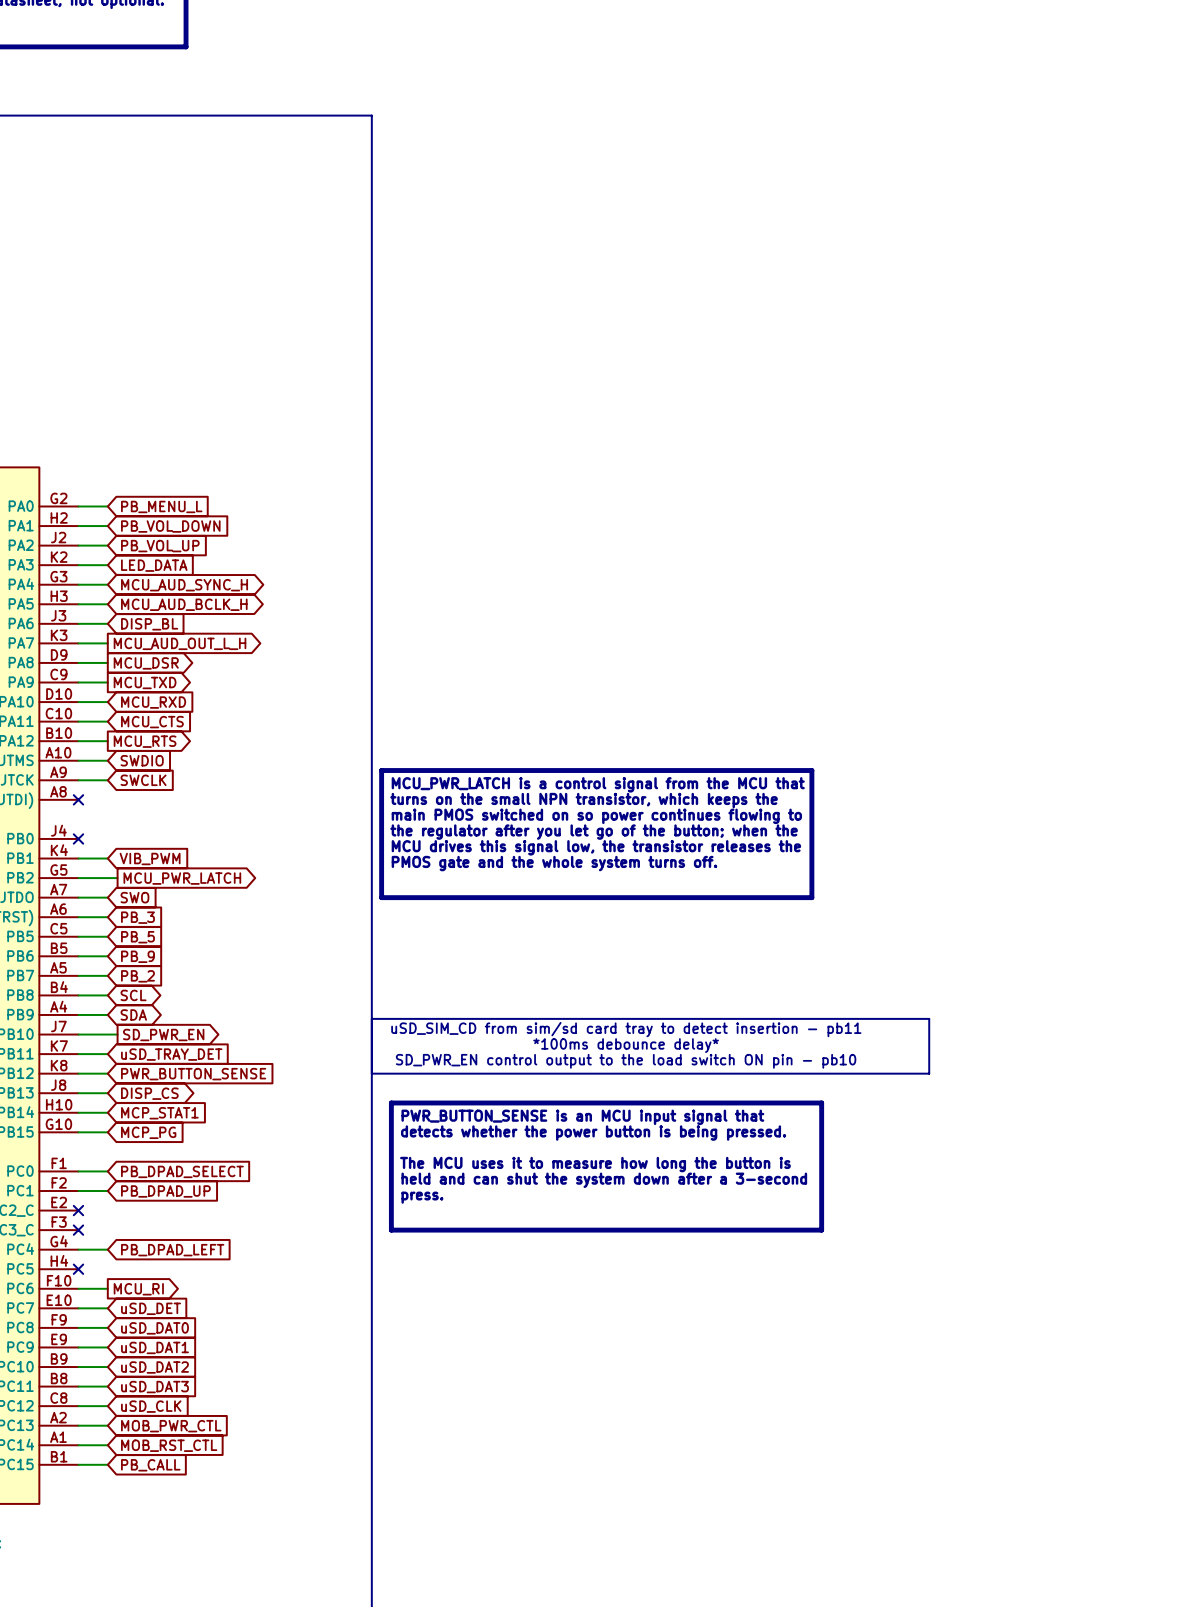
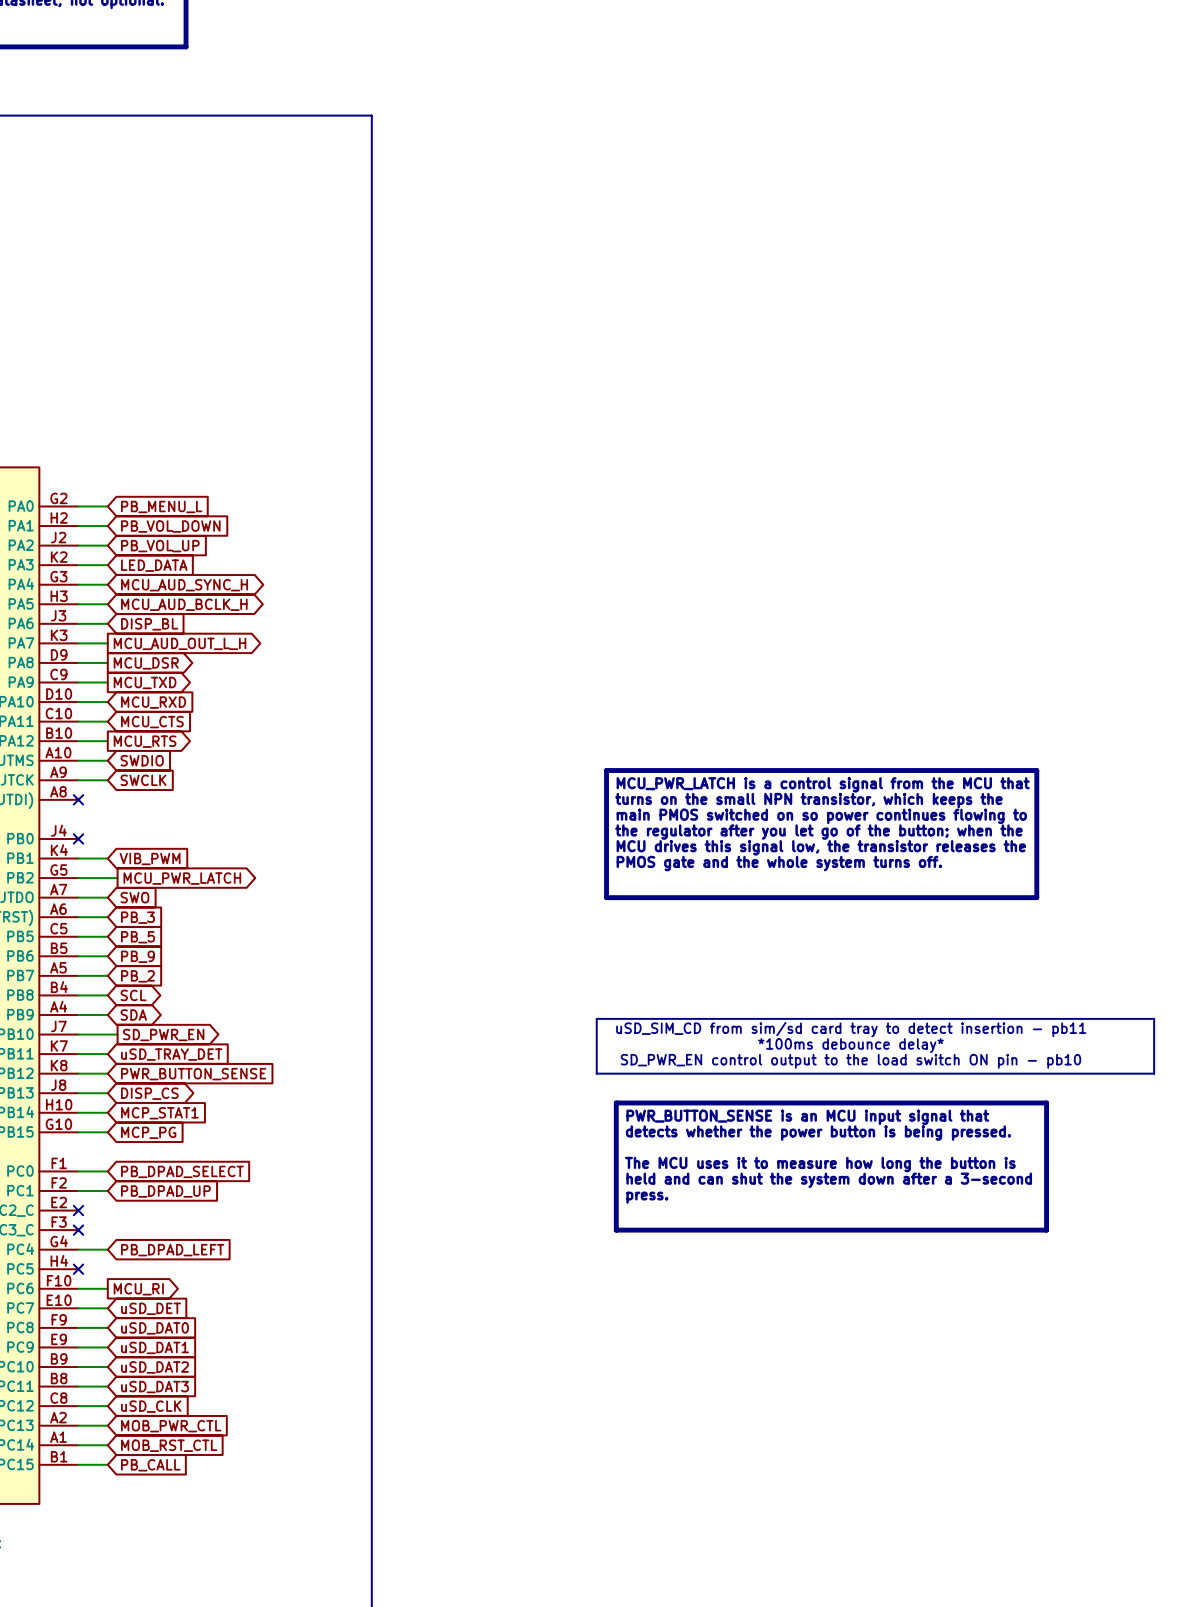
line: (606, 770) (381, 770) (381, 897) (606, 897) -> (606, 770) (606, 897)
line: (811, 770) (811, 897) -> (811, 770) (1036, 770) (1036, 897) (811, 897)
text: MCU_PWR_LATCH is a control signal from the MCU that (598, 784) -> none
text: none -> MCU_PWR_LATCH is a control signal from the MCU that (823, 784)
text: turns on the small NPN transistor, which keeps the (584, 800) -> none
text: none -> turns on the small NPN transistor, which keeps the (808, 800)
text: main PMOS switched on so power continues flowing to (596, 816) -> none
text: none -> main PMOS switched on so power continues flowing to (821, 816)
text: the regulator after you let go of the button; when the (594, 832) -> none
text: none -> the regulator after you let go of the button; when the (818, 832)
text: MCU drives this signal low, the transistor releases the (596, 847) -> none
text: none -> MCU drives this signal low, the transistor releases the (821, 847)
text: PMOS gate and the whole system turns off. (554, 863) -> none
text: none -> PMOS gate and the whole system turns off. (779, 863)
line: (596, 1018) (371, 1018) (371, 1073) (596, 1073) -> (596, 1018) (596, 1073)
line: (929, 1018) (929, 1073) -> (929, 1018) (1154, 1018) (1154, 1073) (929, 1073)
text: uSD_SIM_CD from sim/sd card tray to detect insertion - pb11 (626, 1029) -> none
text: none -> uSD_SIM_CD from sim/sd card tray to detect insertion - pb11 (851, 1029)
text: *100ms debounce delay* (626, 1045) -> none
text: none -> *100ms debounce delay* (850, 1045)
text: SD_PWR_EN control output to the load switch ON pin - pb10 (626, 1061) -> none
text: none -> SD_PWR_EN control output to the load switch ON pin - pb10 (850, 1061)
line: (616, 1102) (391, 1102) (391, 1230) (616, 1230) -> (616, 1102) (616, 1230)
line: (821, 1102) (821, 1230) -> (821, 1102) (1046, 1102) (1046, 1230) (821, 1230)
text: PWR_BUTTON_SENSE is an MCU input signal that (582, 1117) -> none
text: none -> PWR_BUTTON_SENSE is an MCU input signal that (807, 1117)
text: detects whether the power button is being pressed. (593, 1133) -> none
text: none -> detects whether the power button is being pressed. (818, 1133)
text: The MCU uses it to measure how long the button is (595, 1164) -> none
text: none -> The MCU uses it to measure how long the button is (820, 1164)
text: held and can shut the system down after a 3-second (604, 1180) -> none
text: none -> held and can shut the system down after a 3-second (829, 1180)
text: press. (422, 1197) -> none
text: none -> press. (647, 1197)

